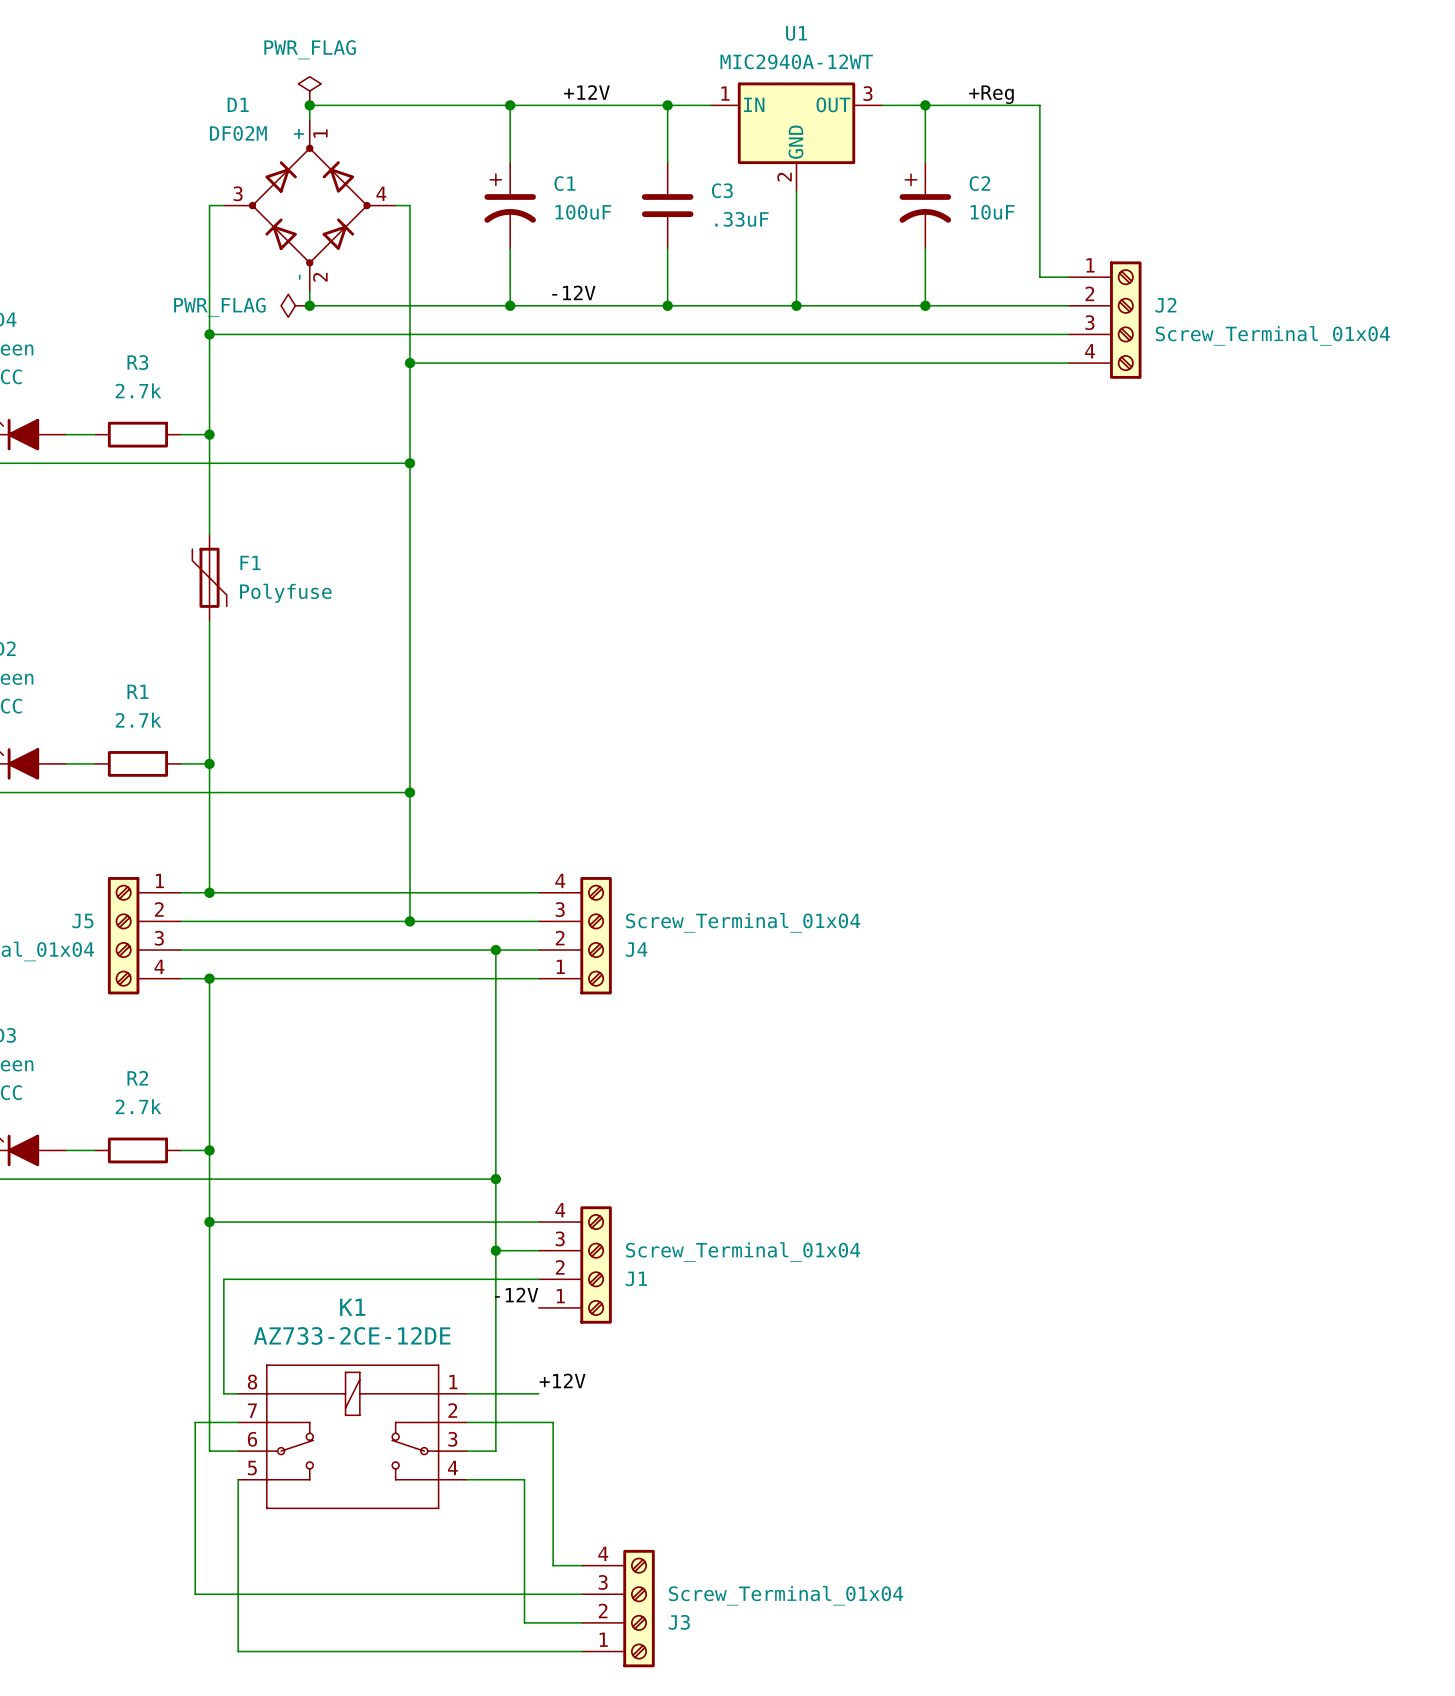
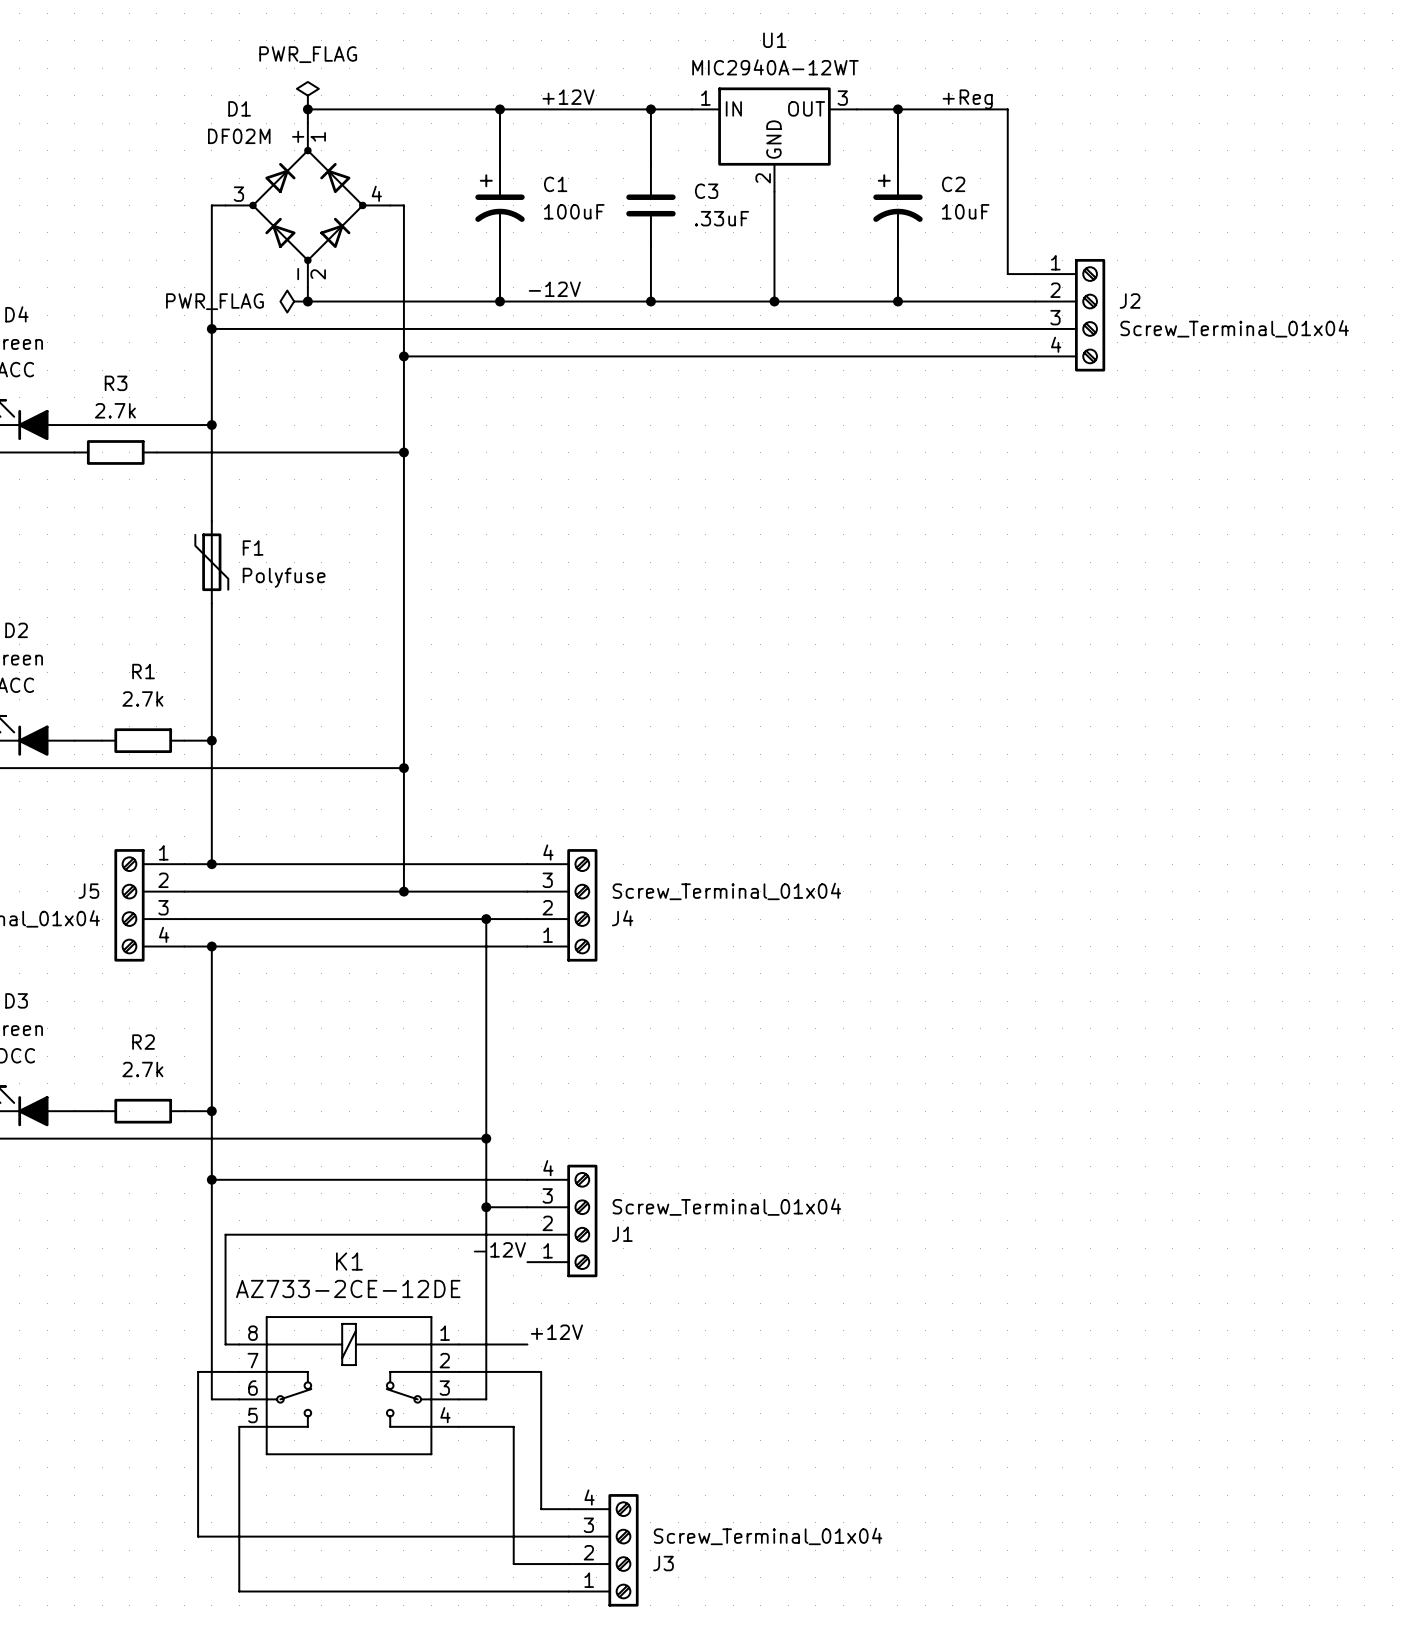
R3 position: (137, 434) -> (115, 452)
wire: (66, 463) (152, 463) -> (102, 425) (184, 425)

